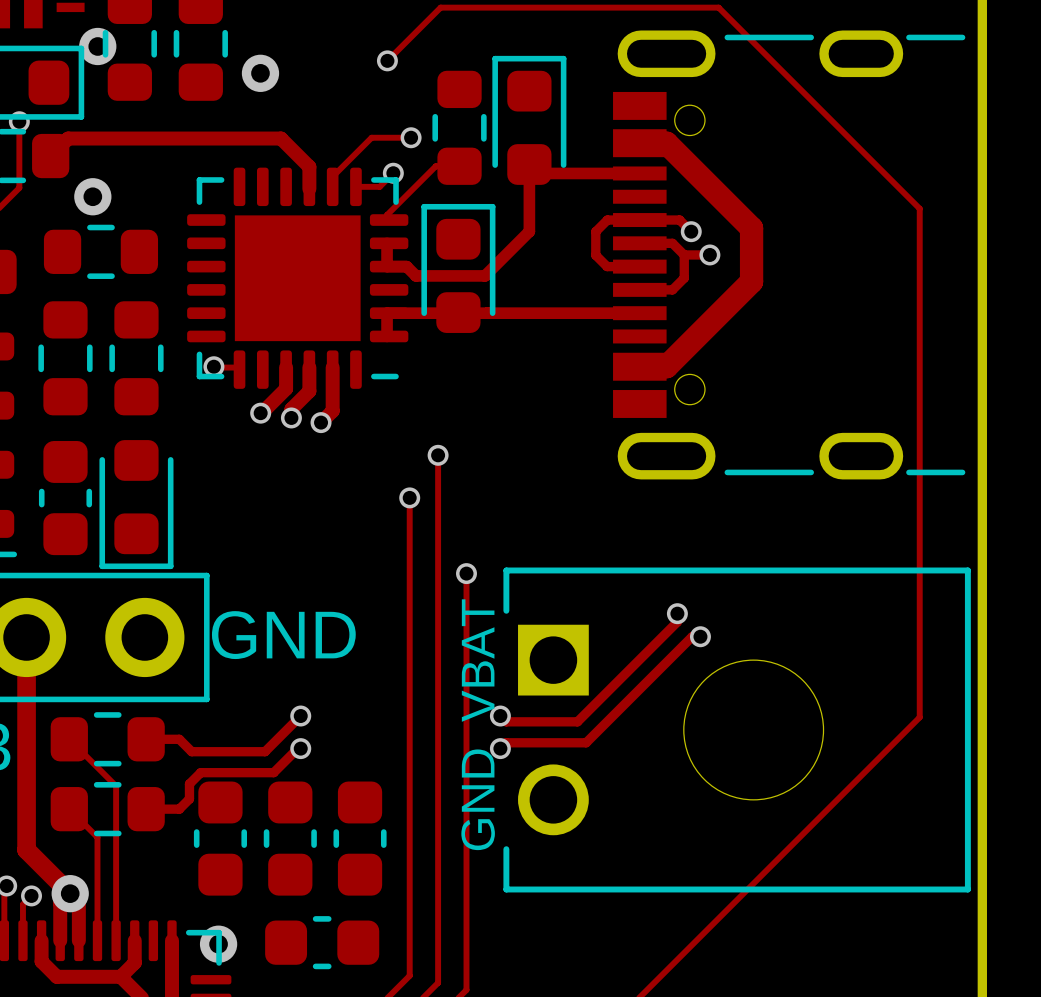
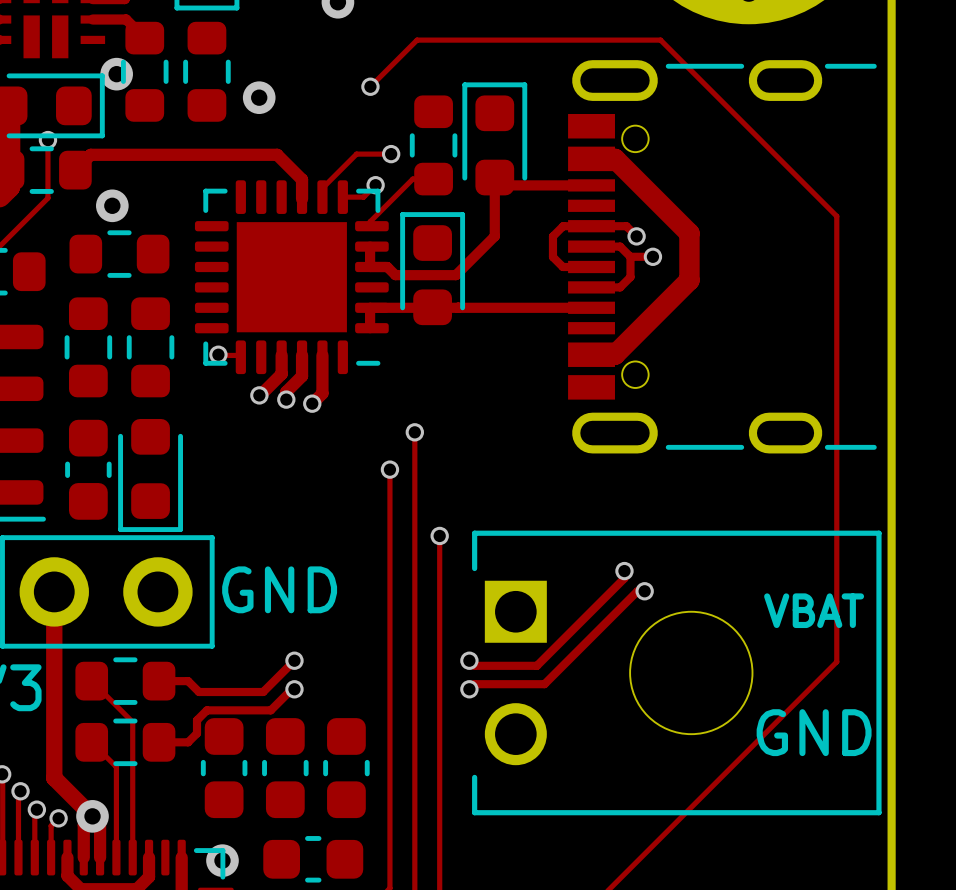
text rotation: 0° (478, 660) -> 90° clockwise (814, 610)
text position: VBAT (478, 660) -> VBAT (814, 610)
text: none -> GND (814, 732)
text: GND (478, 799) -> none

